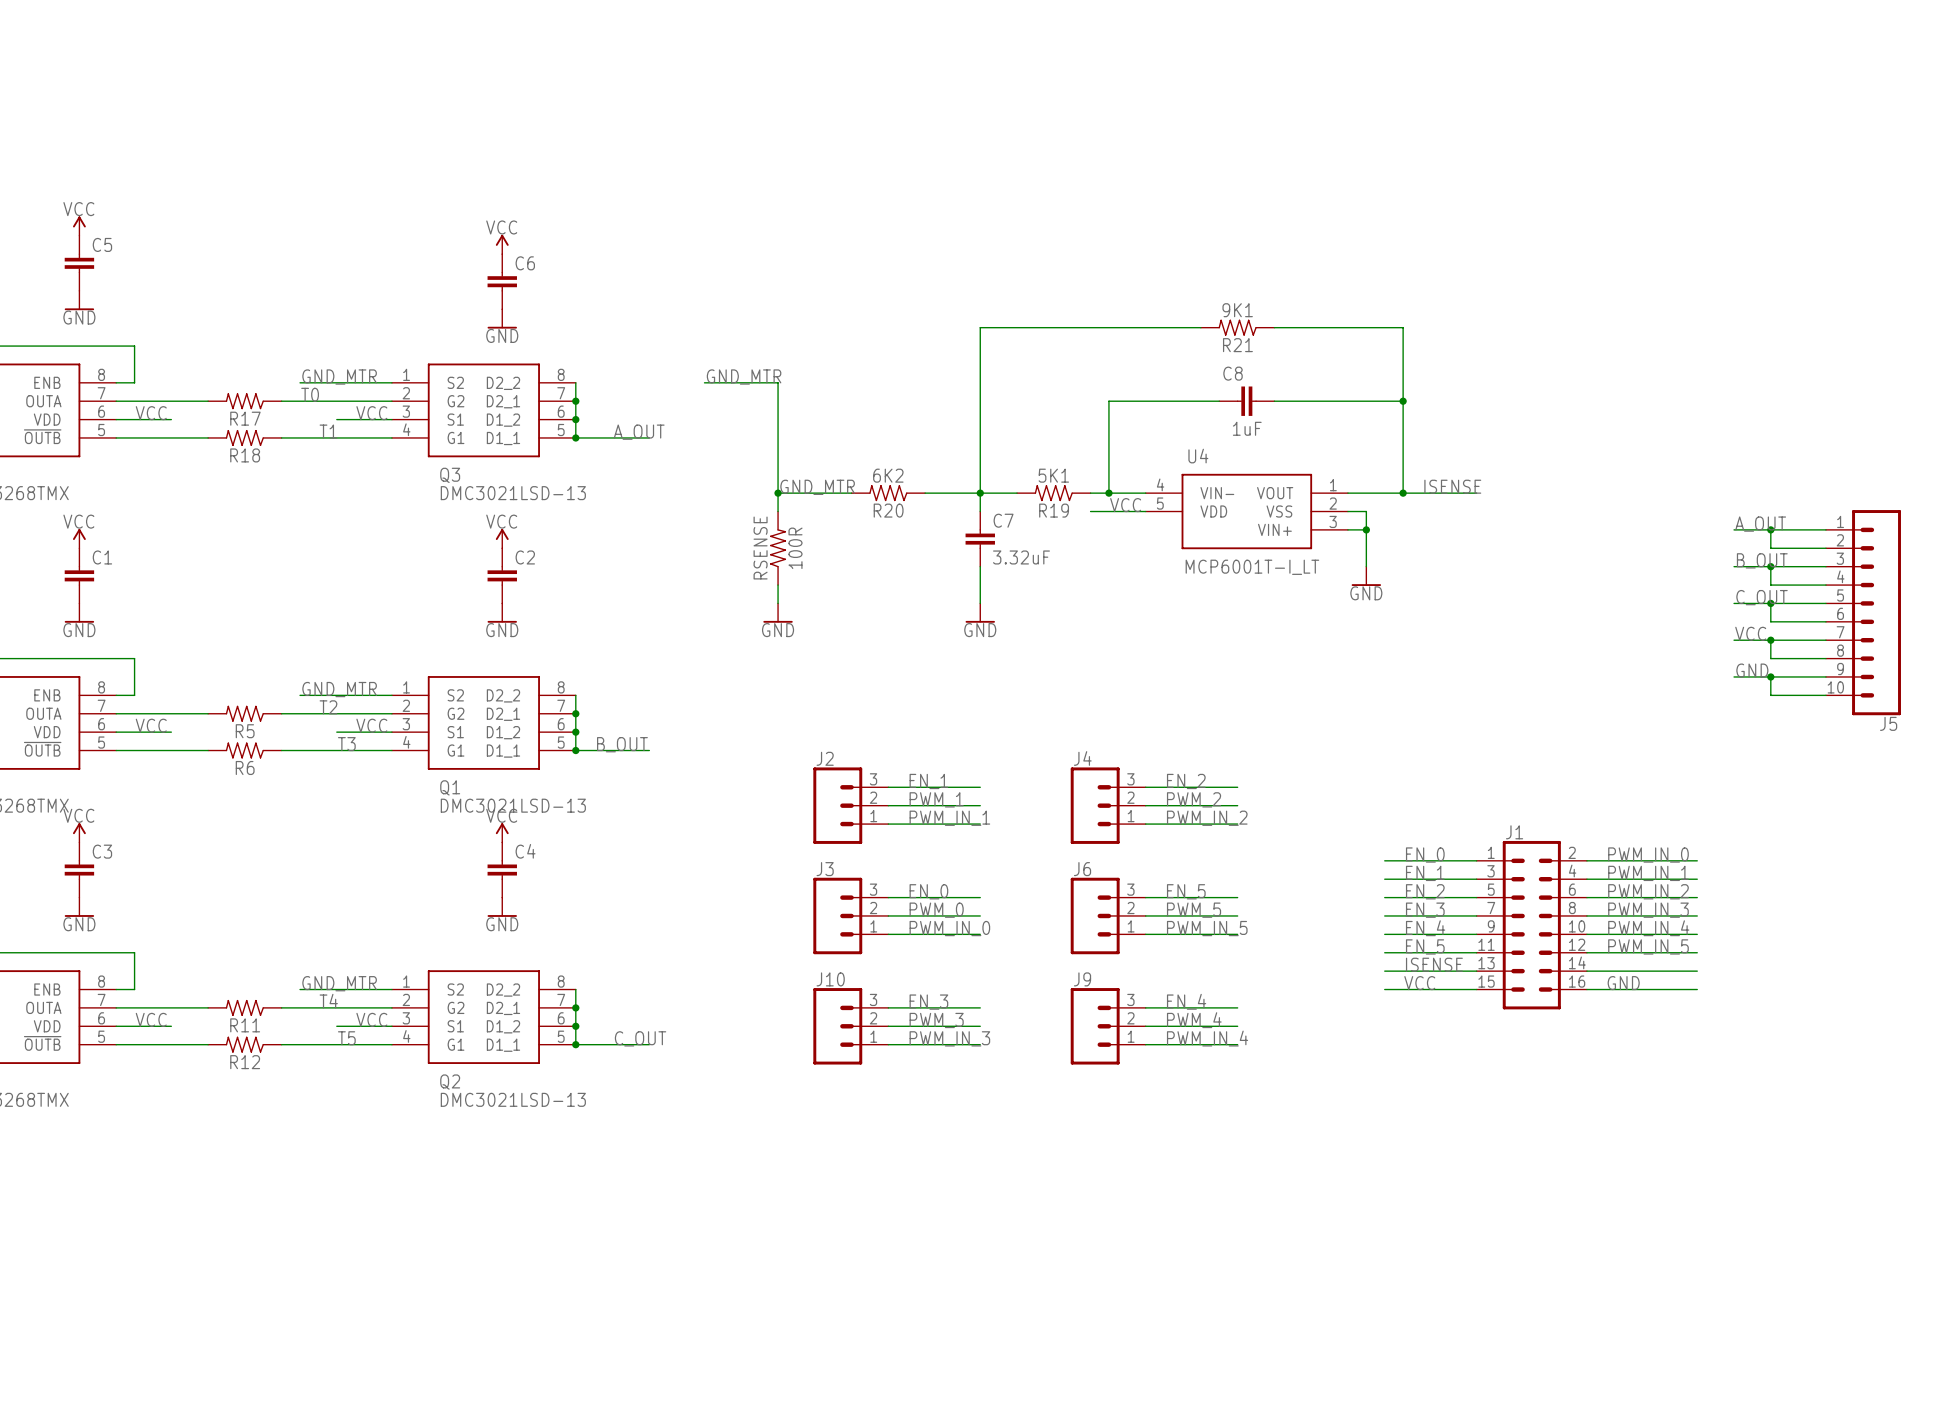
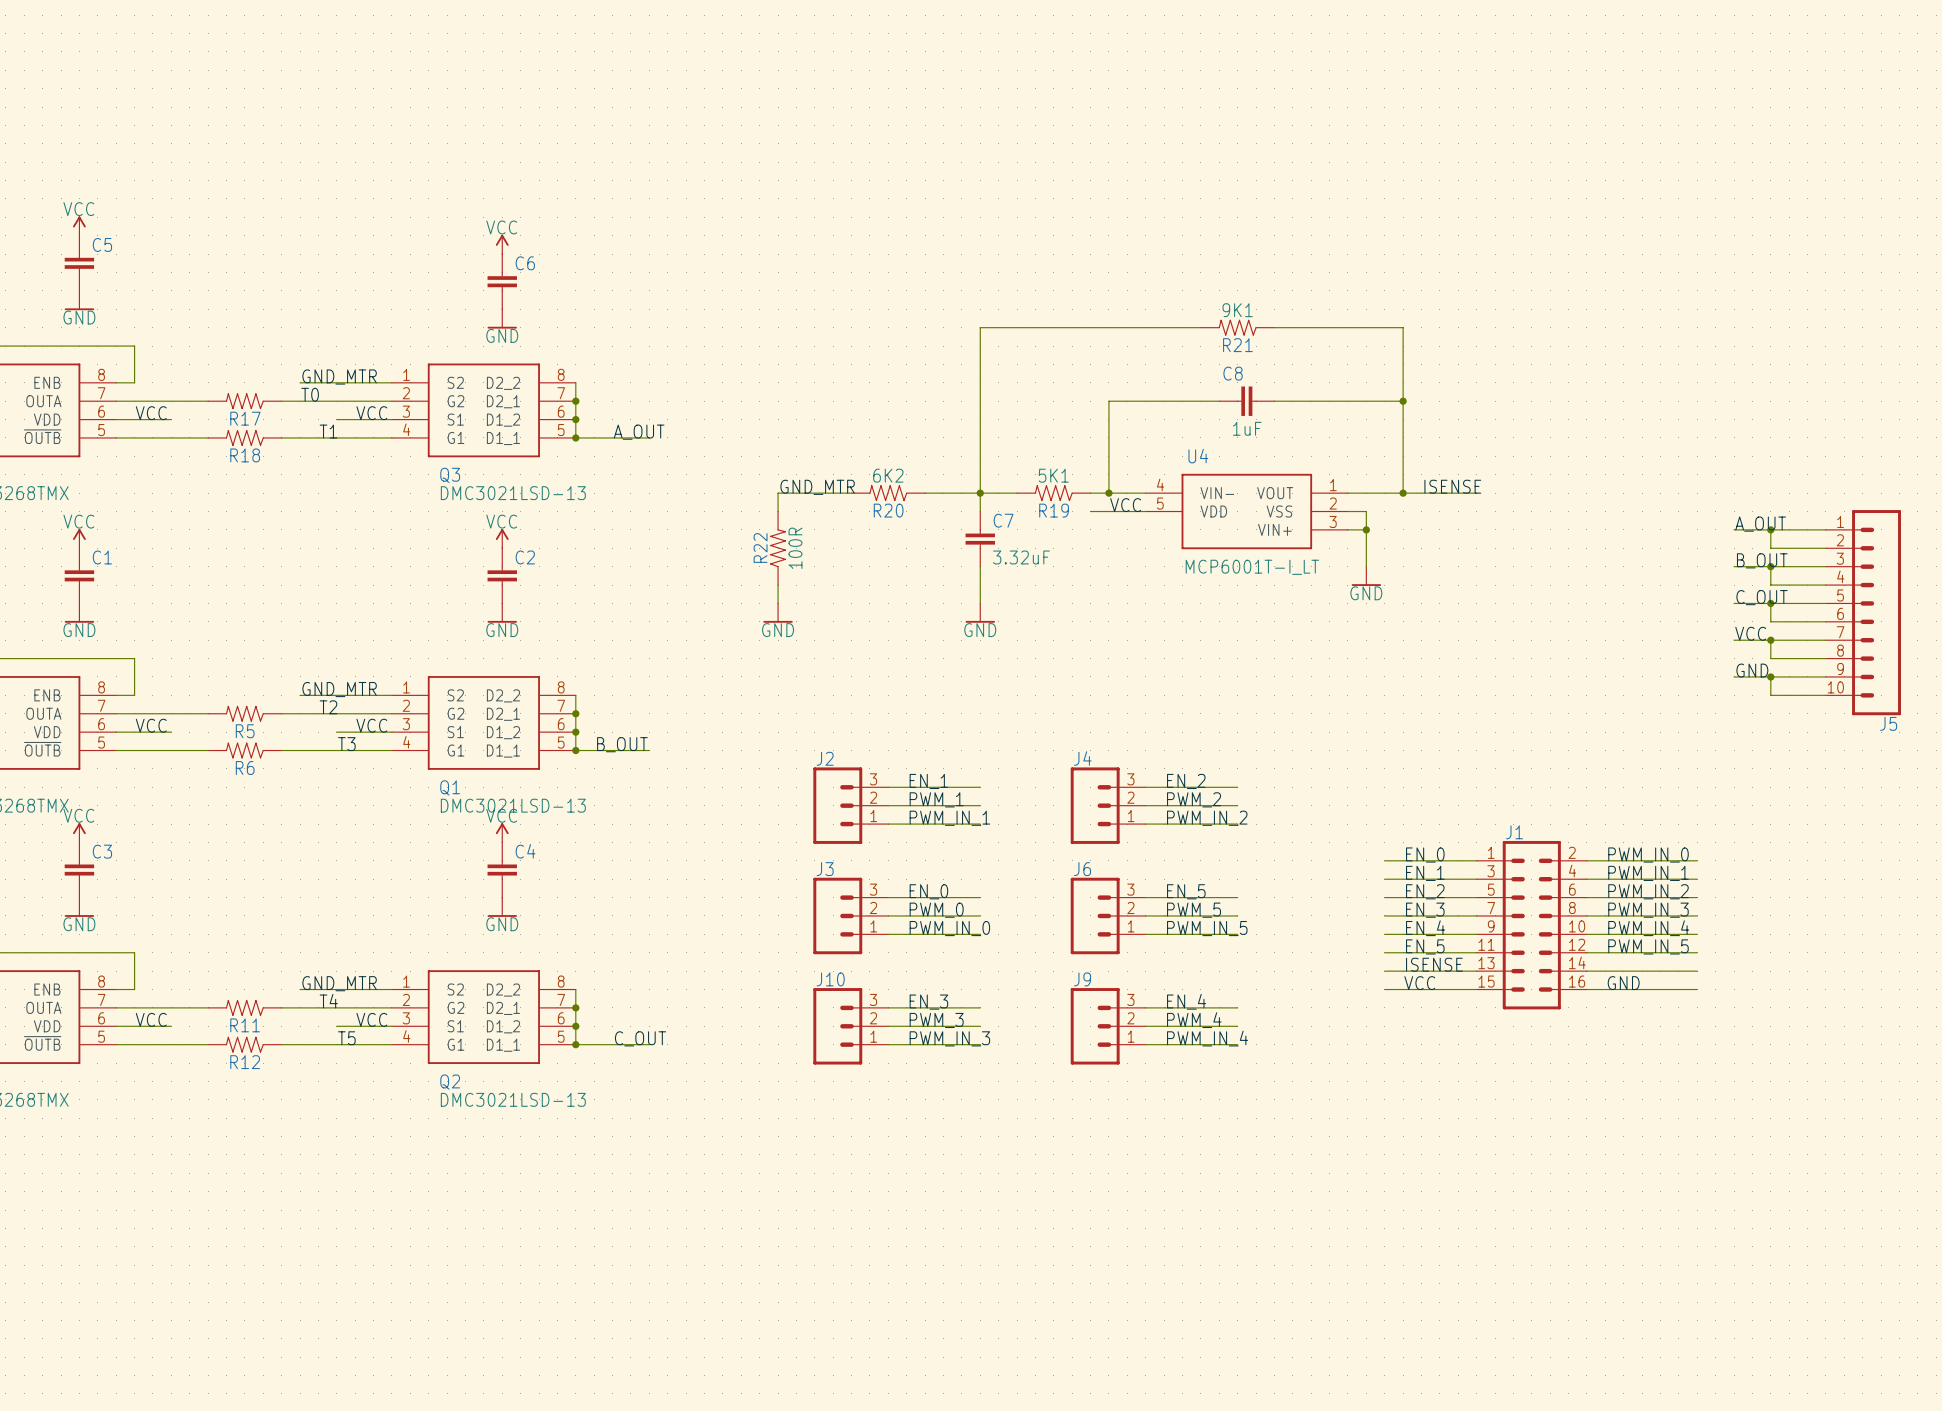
label: GND_MTR (744, 377) -> none
wire: (704, 382) (778, 382) (778, 493) -> none
junction: (778, 493) -> none
RSENSE name: RSENSE (760, 548) -> R22 (760, 548)

